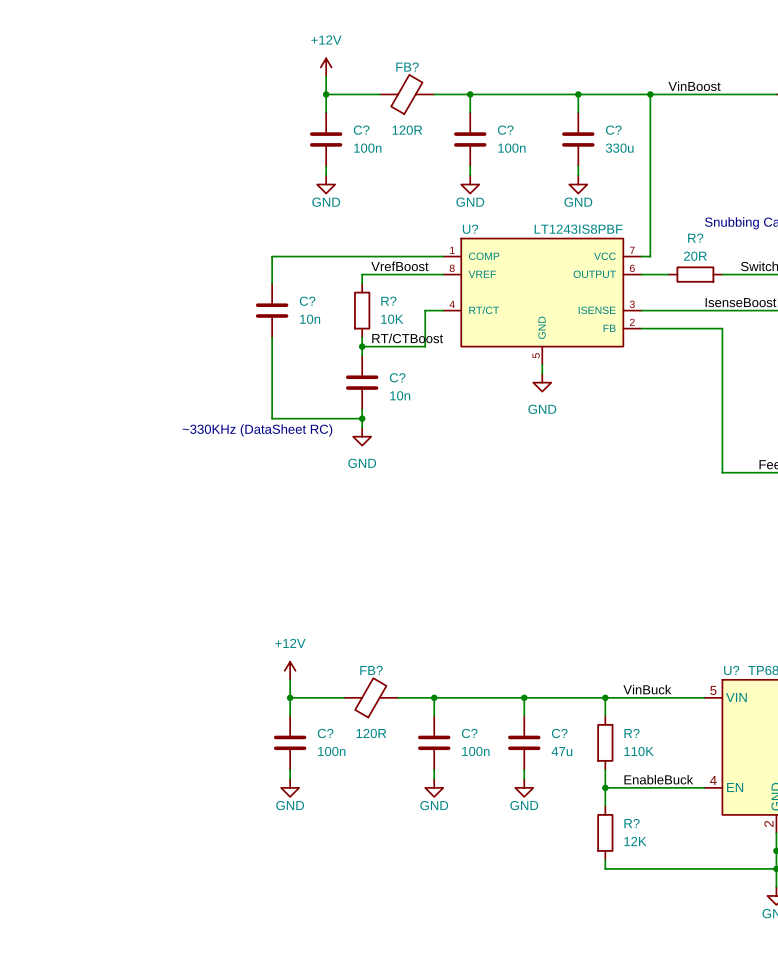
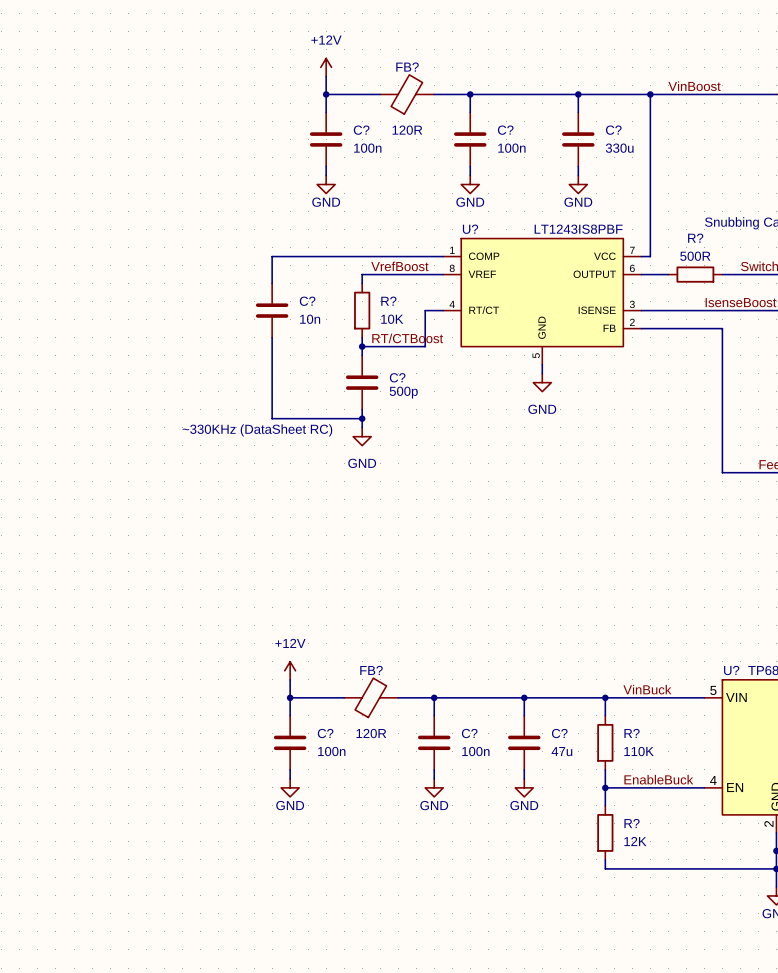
R? value: 20R (695, 256) -> 500R (695, 256)
C? value: 10n (400, 395) -> 500p (403, 392)

